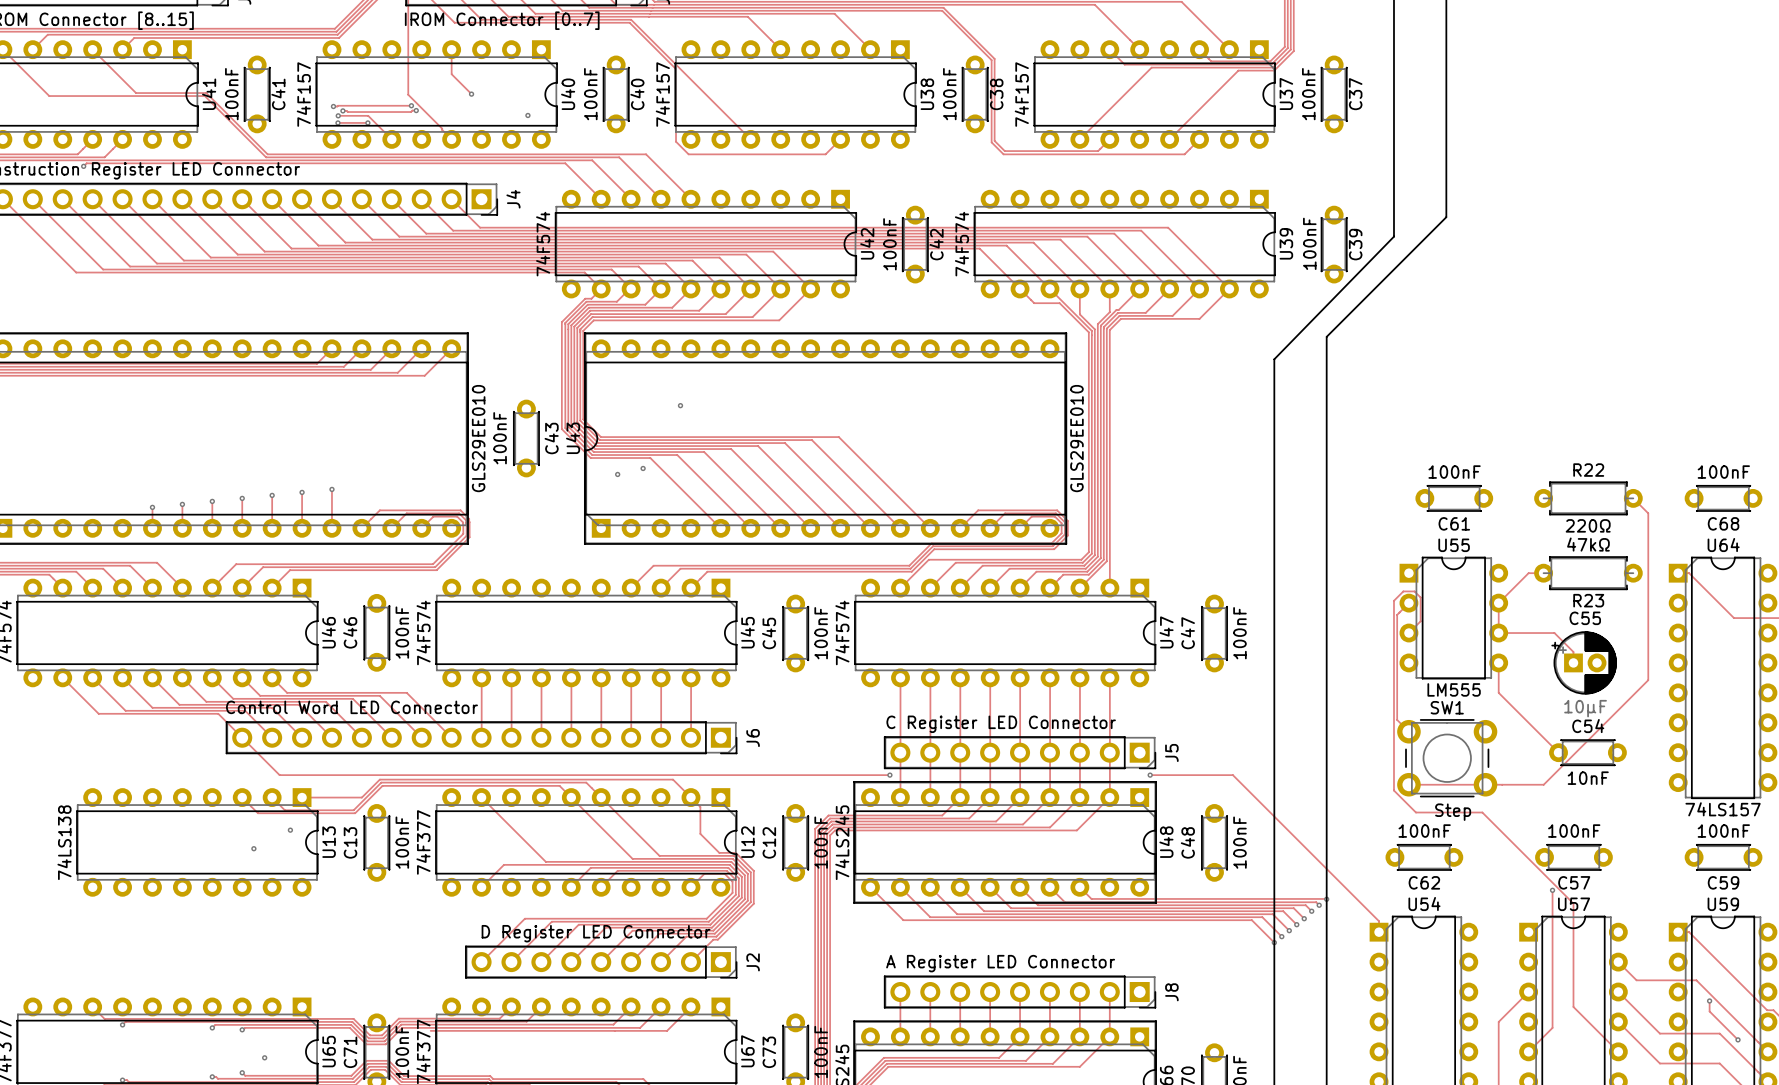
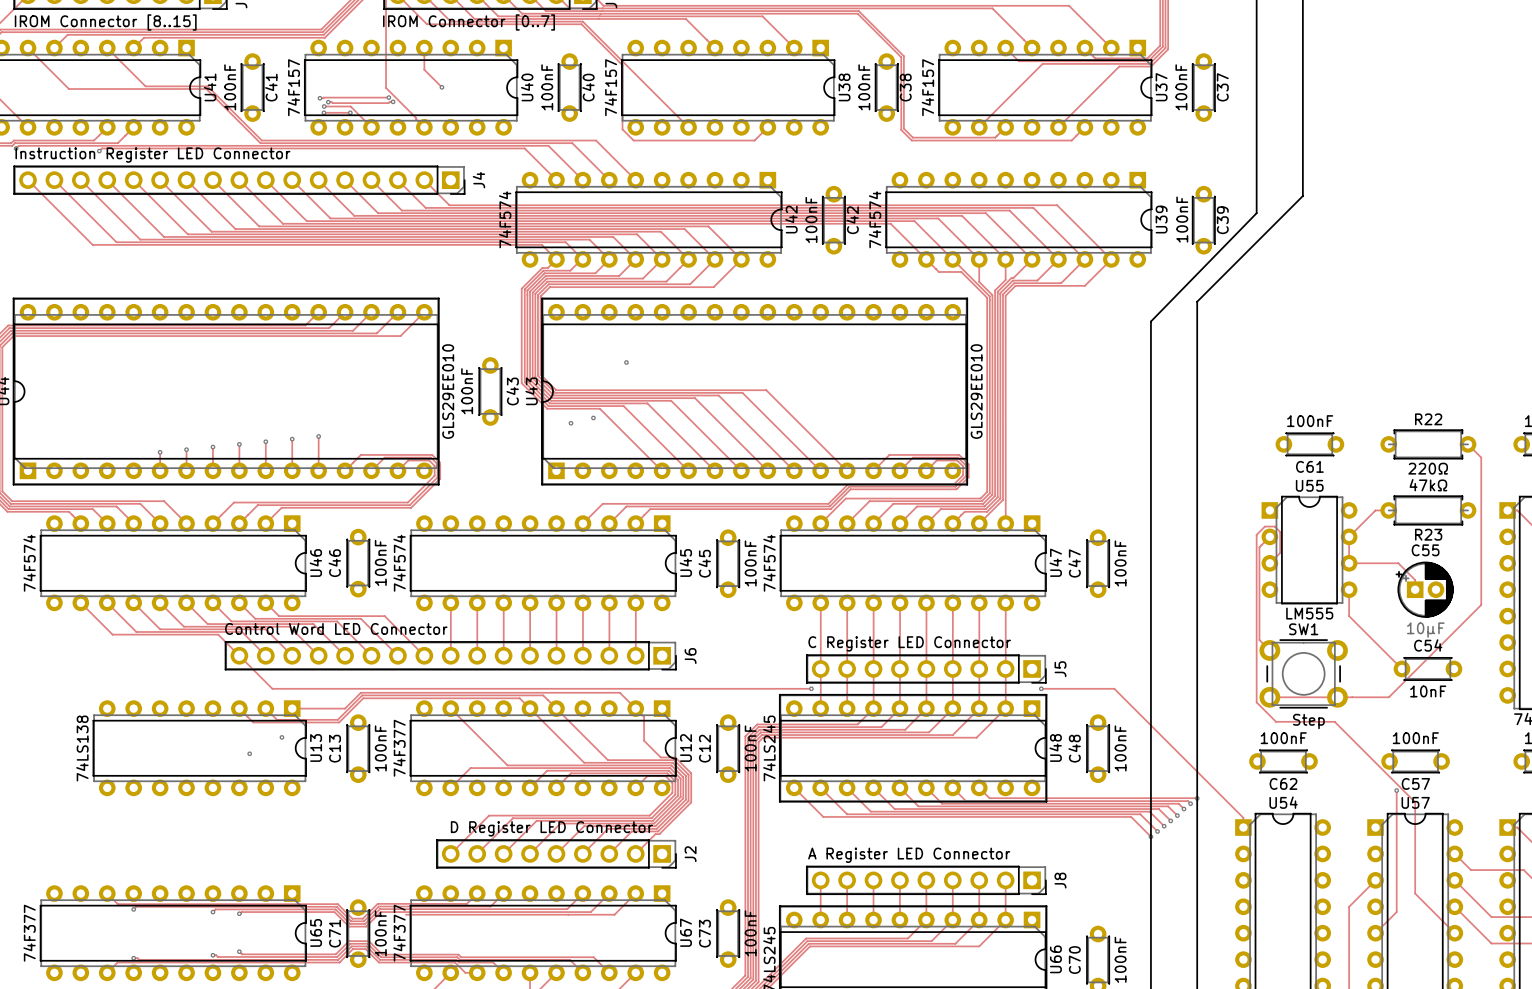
via: (527, 115) -> none
via: (264, 1057) -> none

